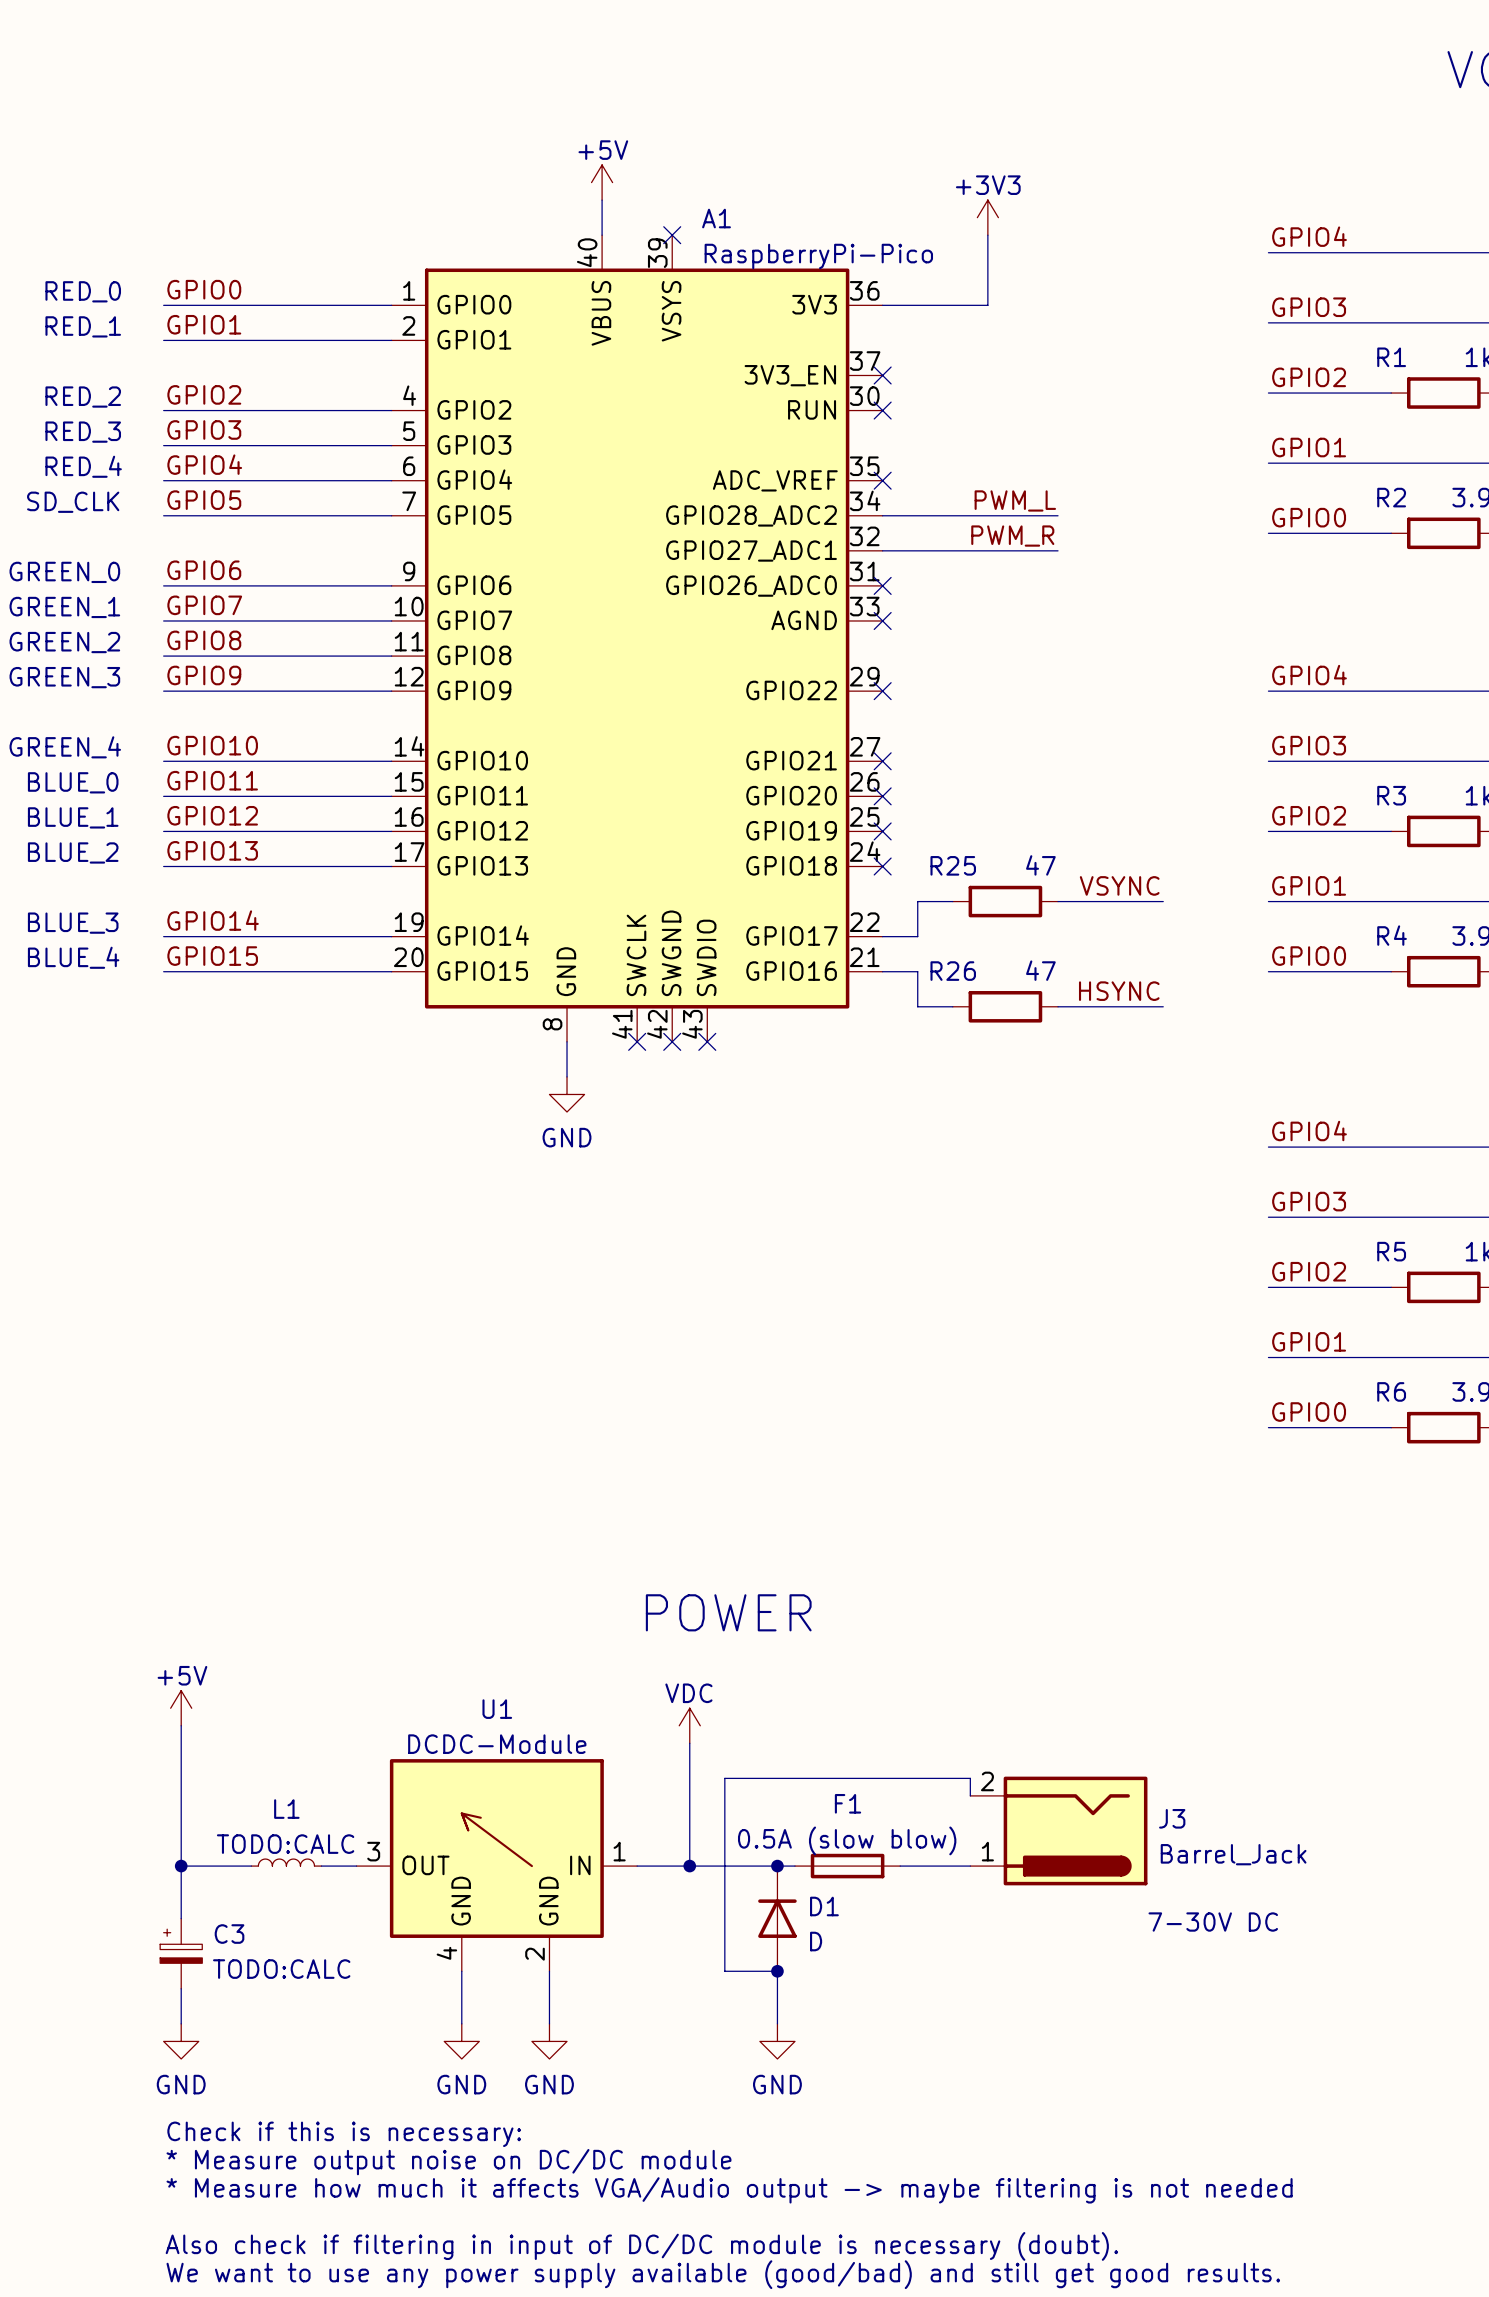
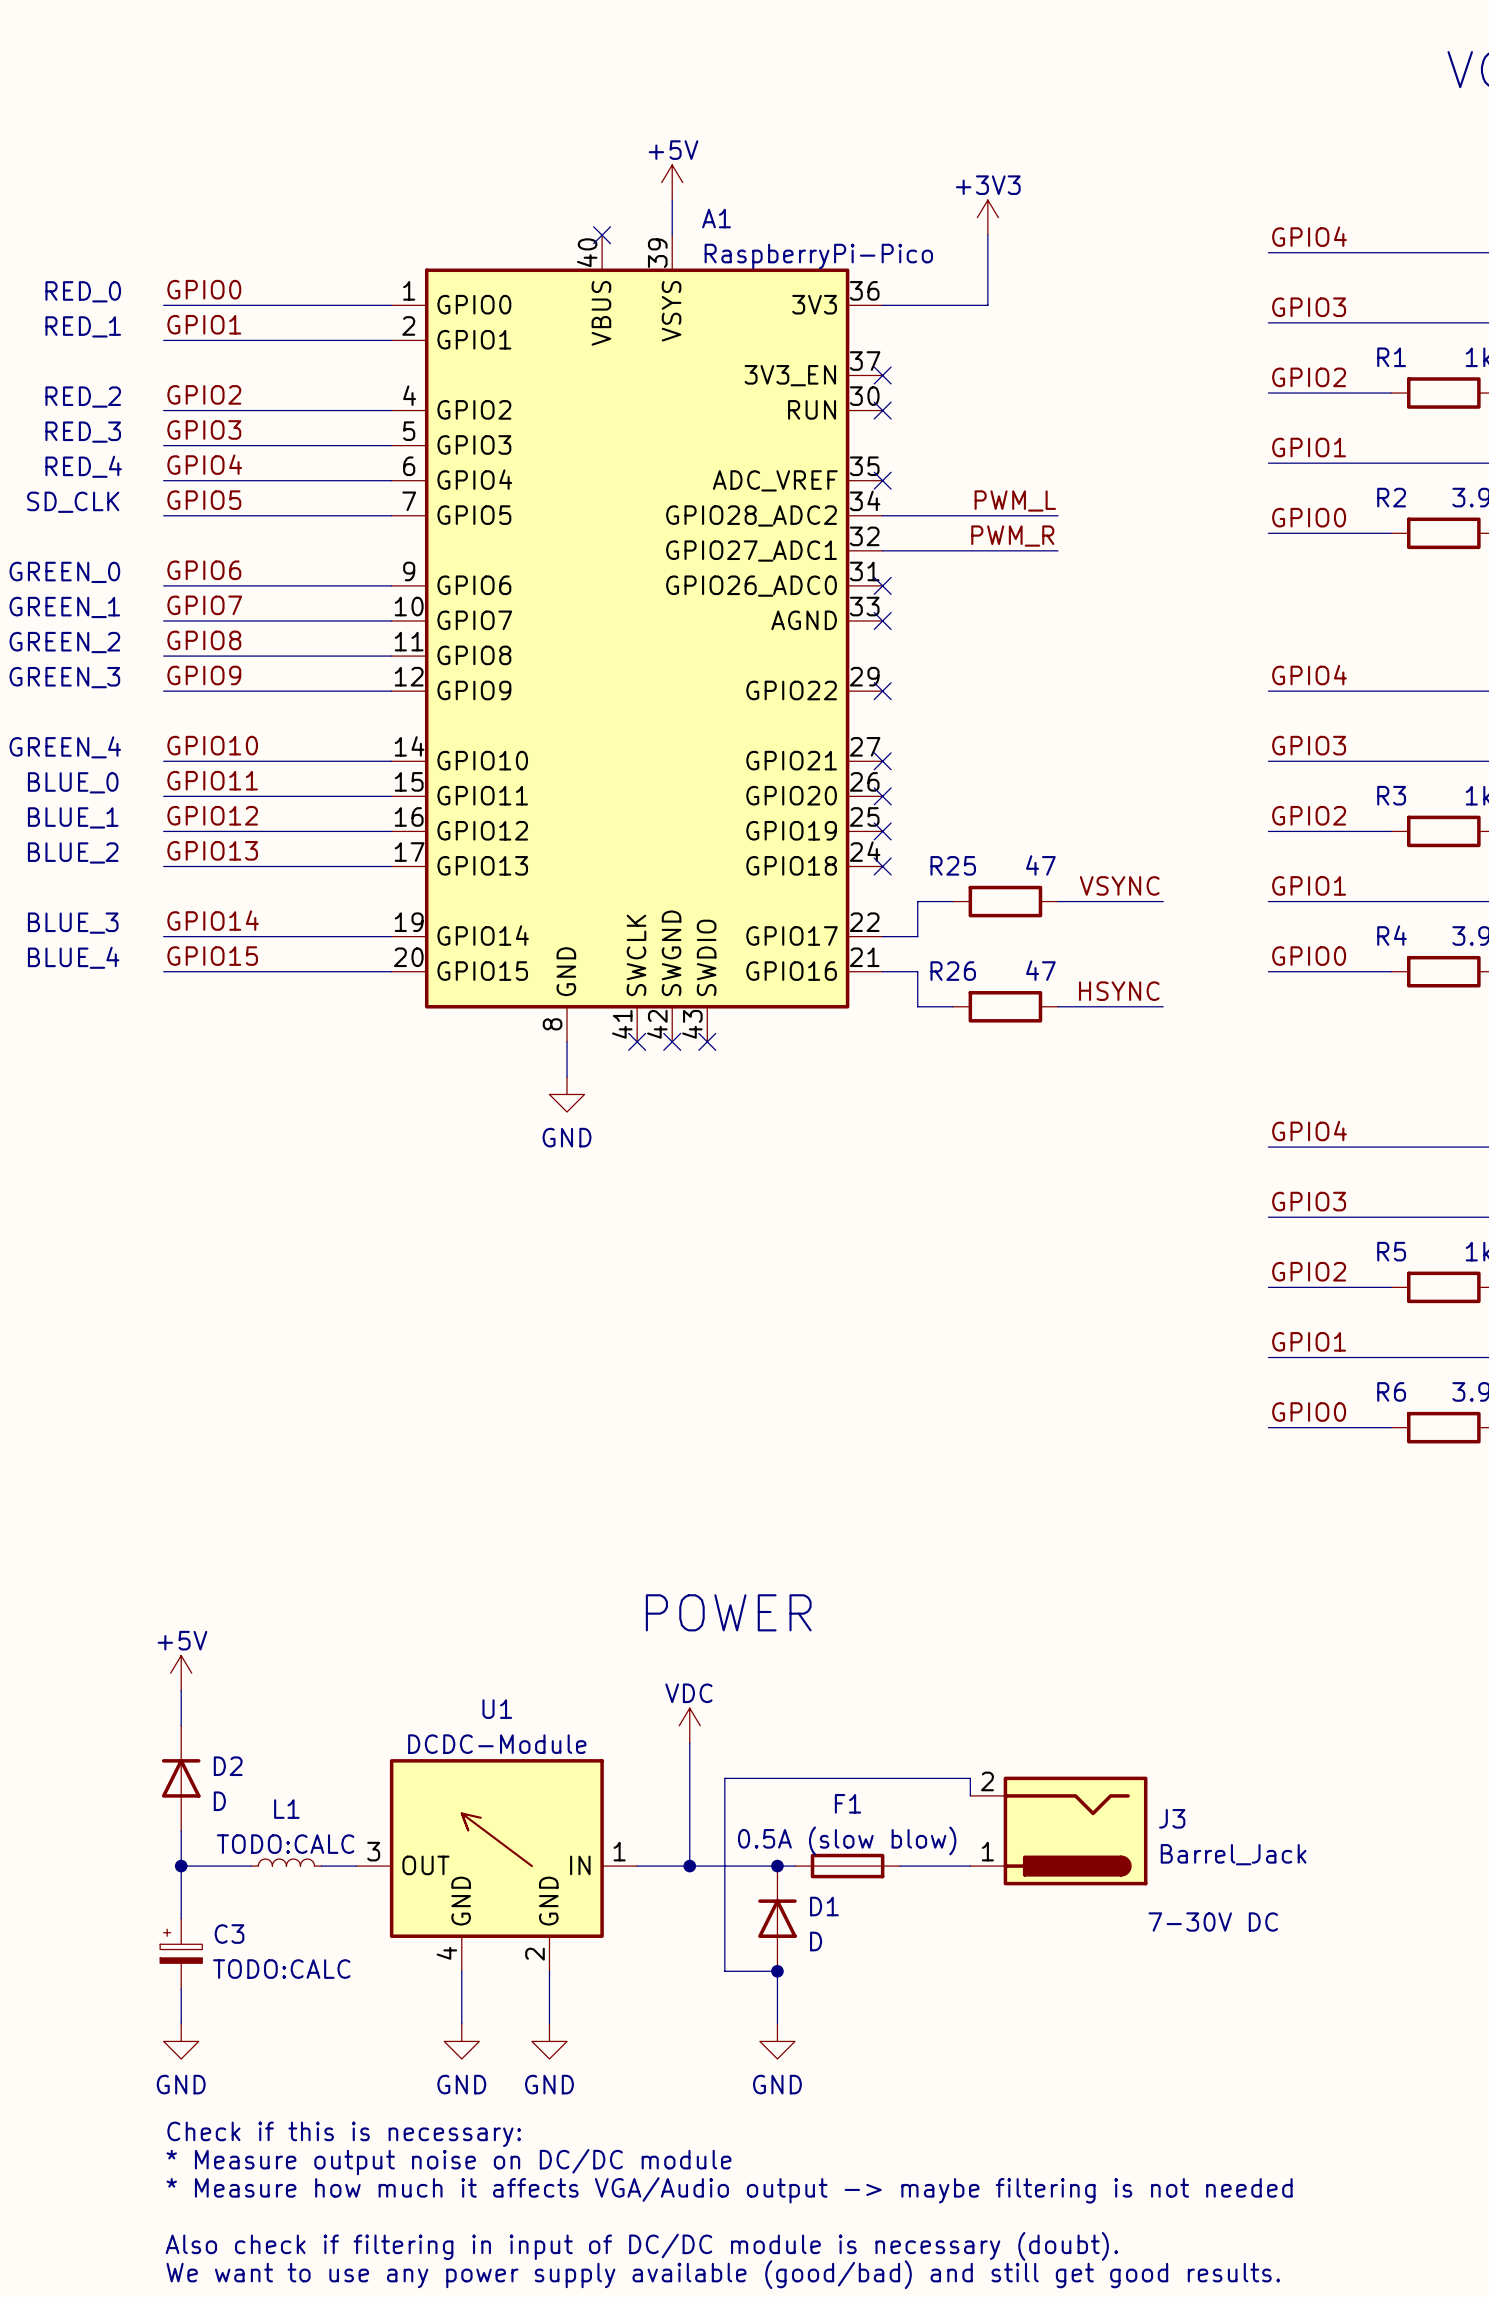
power symbol position: +5V (602, 182) -> +5V (672, 182)
wire: (602, 200) (602, 235) -> (672, 200) (672, 235)
no-connect mark position: (672, 235) -> (602, 235)
power symbol position: +5V (181, 1708) -> +5V (181, 1673)
D2: none -> D (181, 1778)

